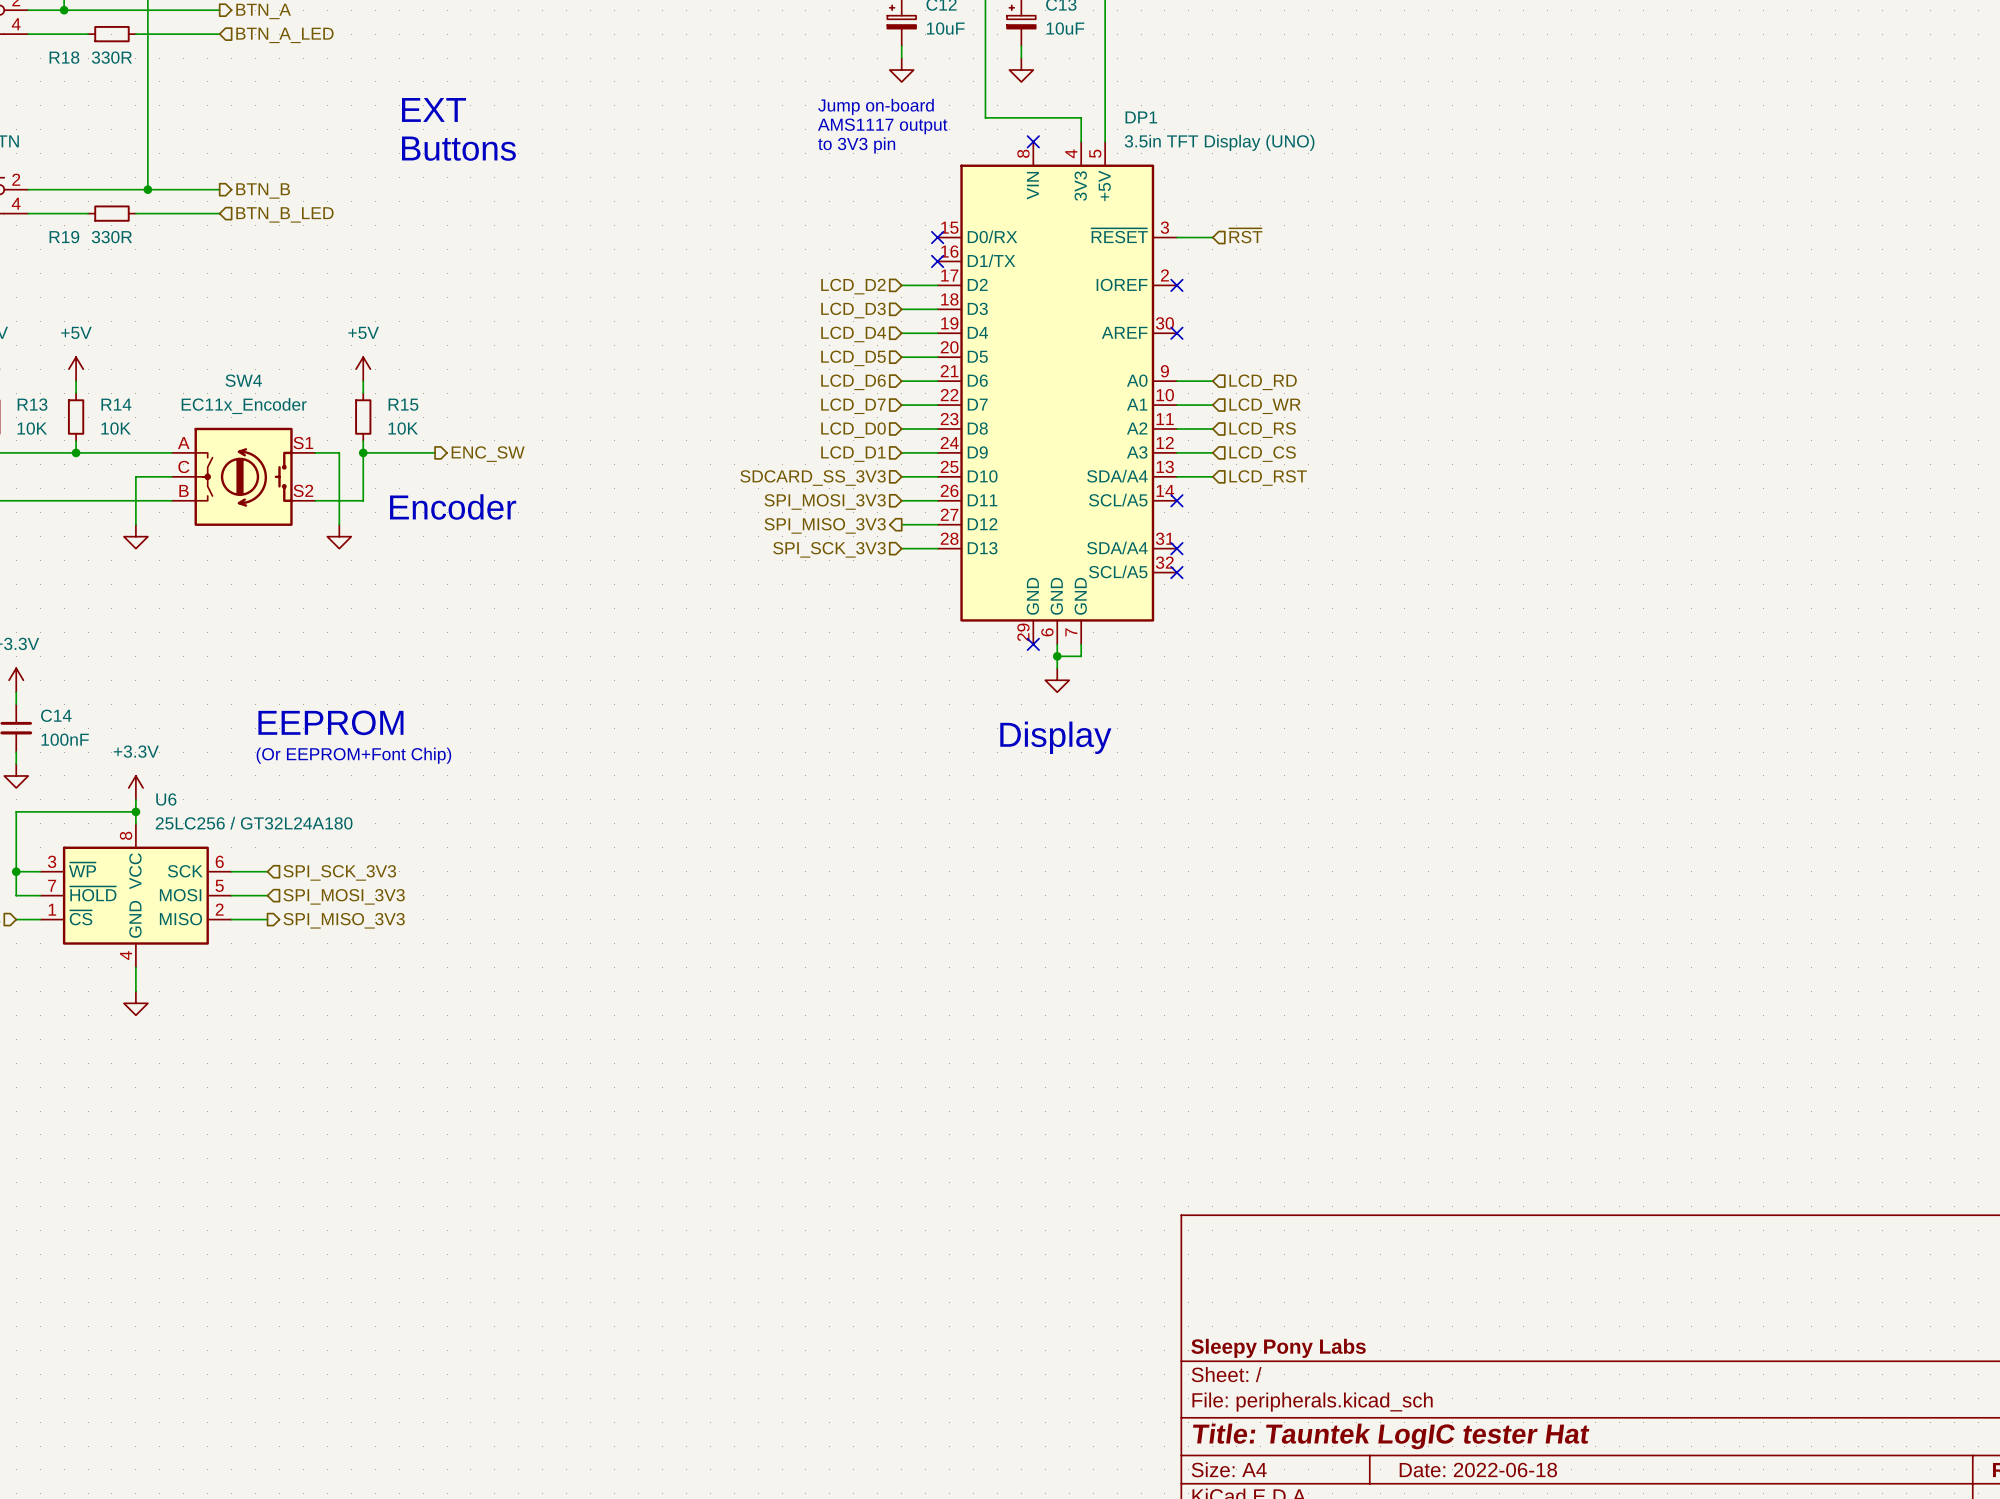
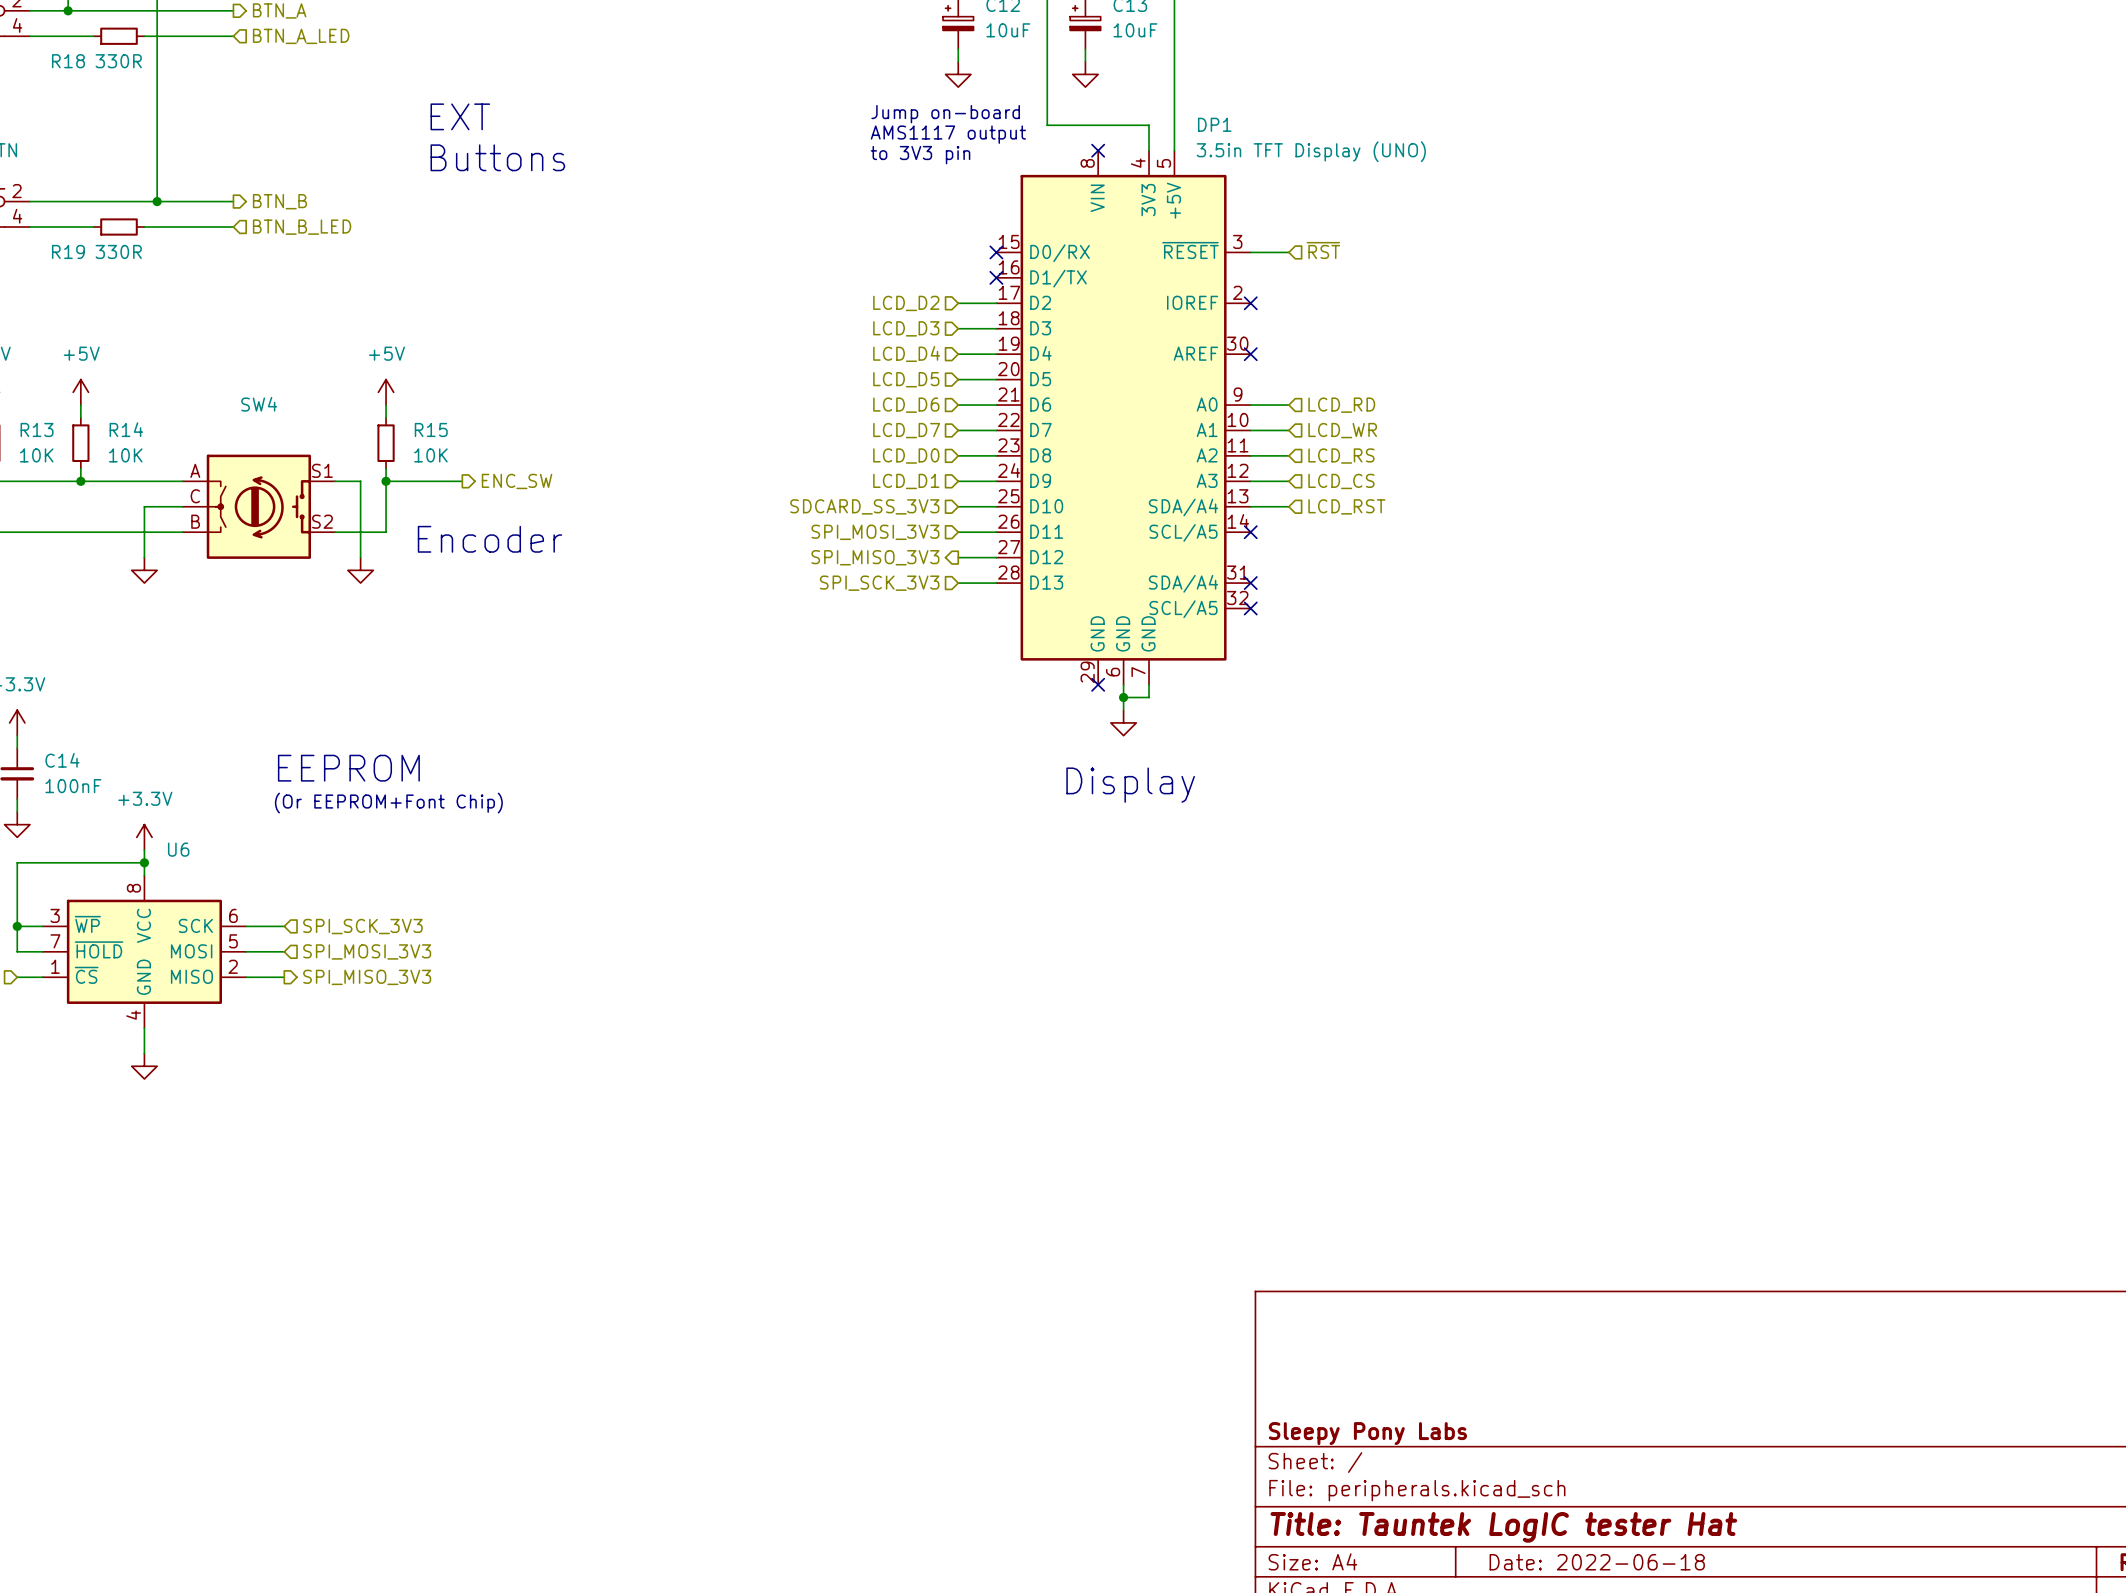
SW4 value: EC11x_Encoder (244, 406) -> none
U6 value: 25LC256 / GT32L24A180 (254, 823) -> none

